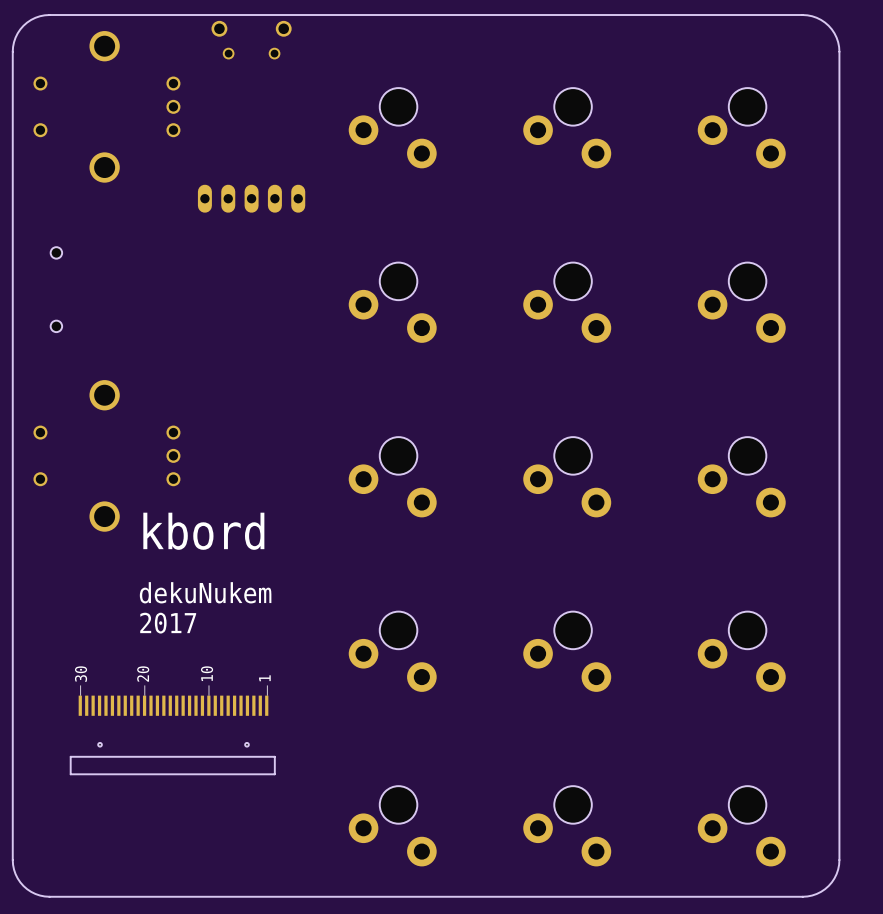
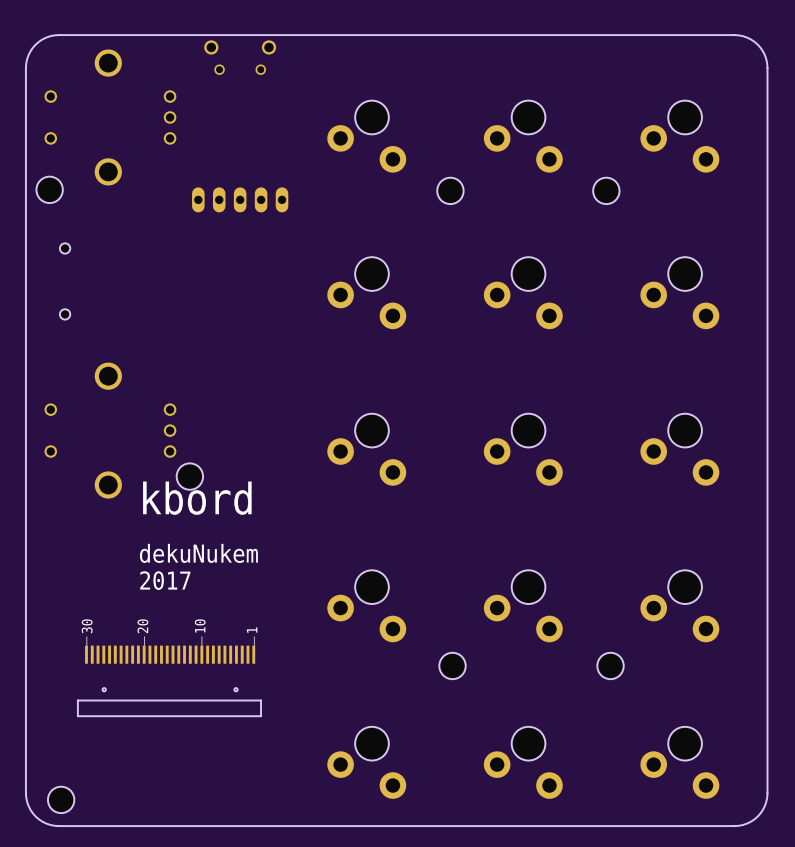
part: none -> (49, 189)
part: none -> (450, 190)
part: none -> (606, 190)
part: none -> (189, 476)
part: none -> (452, 665)
part: none -> (610, 665)
part: none -> (61, 799)

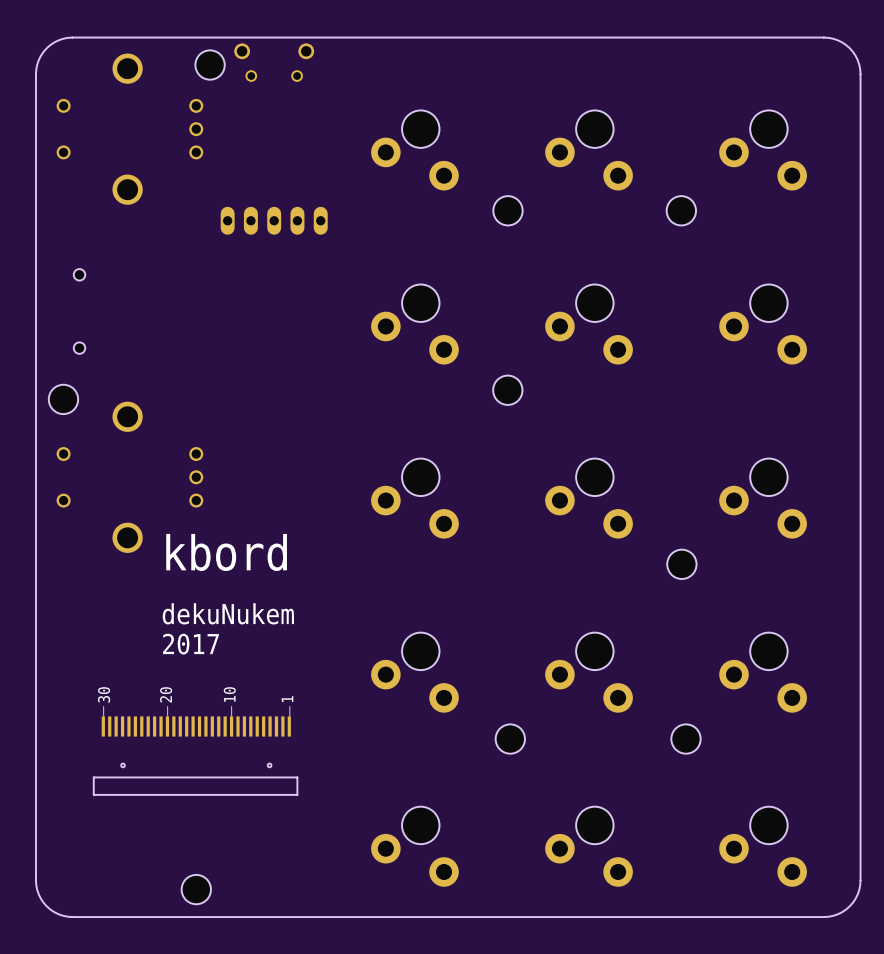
part: none -> (210, 65)
part: (49, 189) -> none
part: none -> (507, 390)
part: none -> (63, 399)
part: (189, 476) -> none
part: none -> (681, 564)
part position: (61, 799) -> (196, 889)

